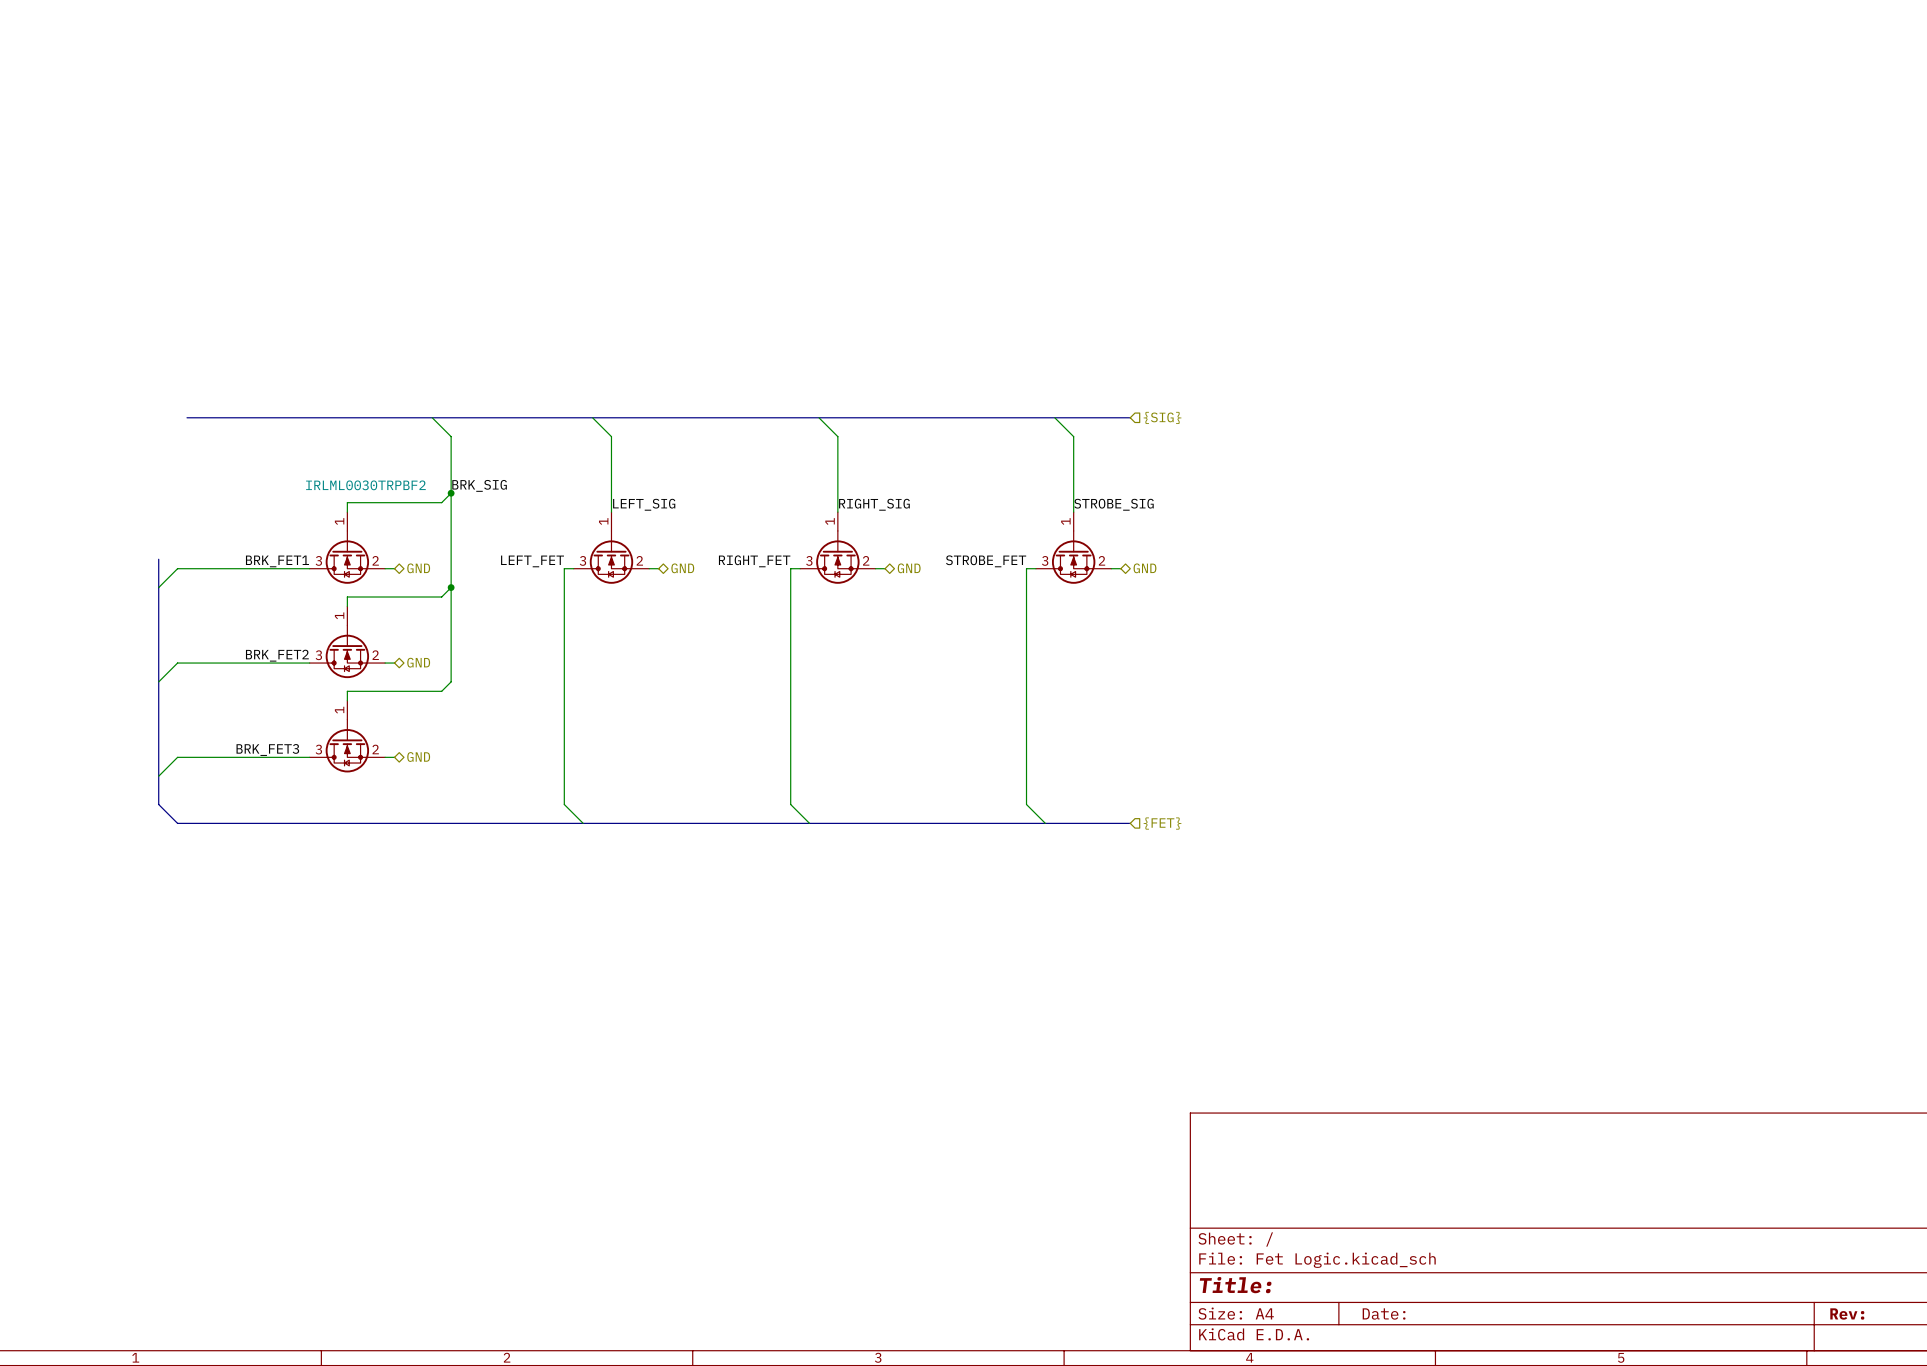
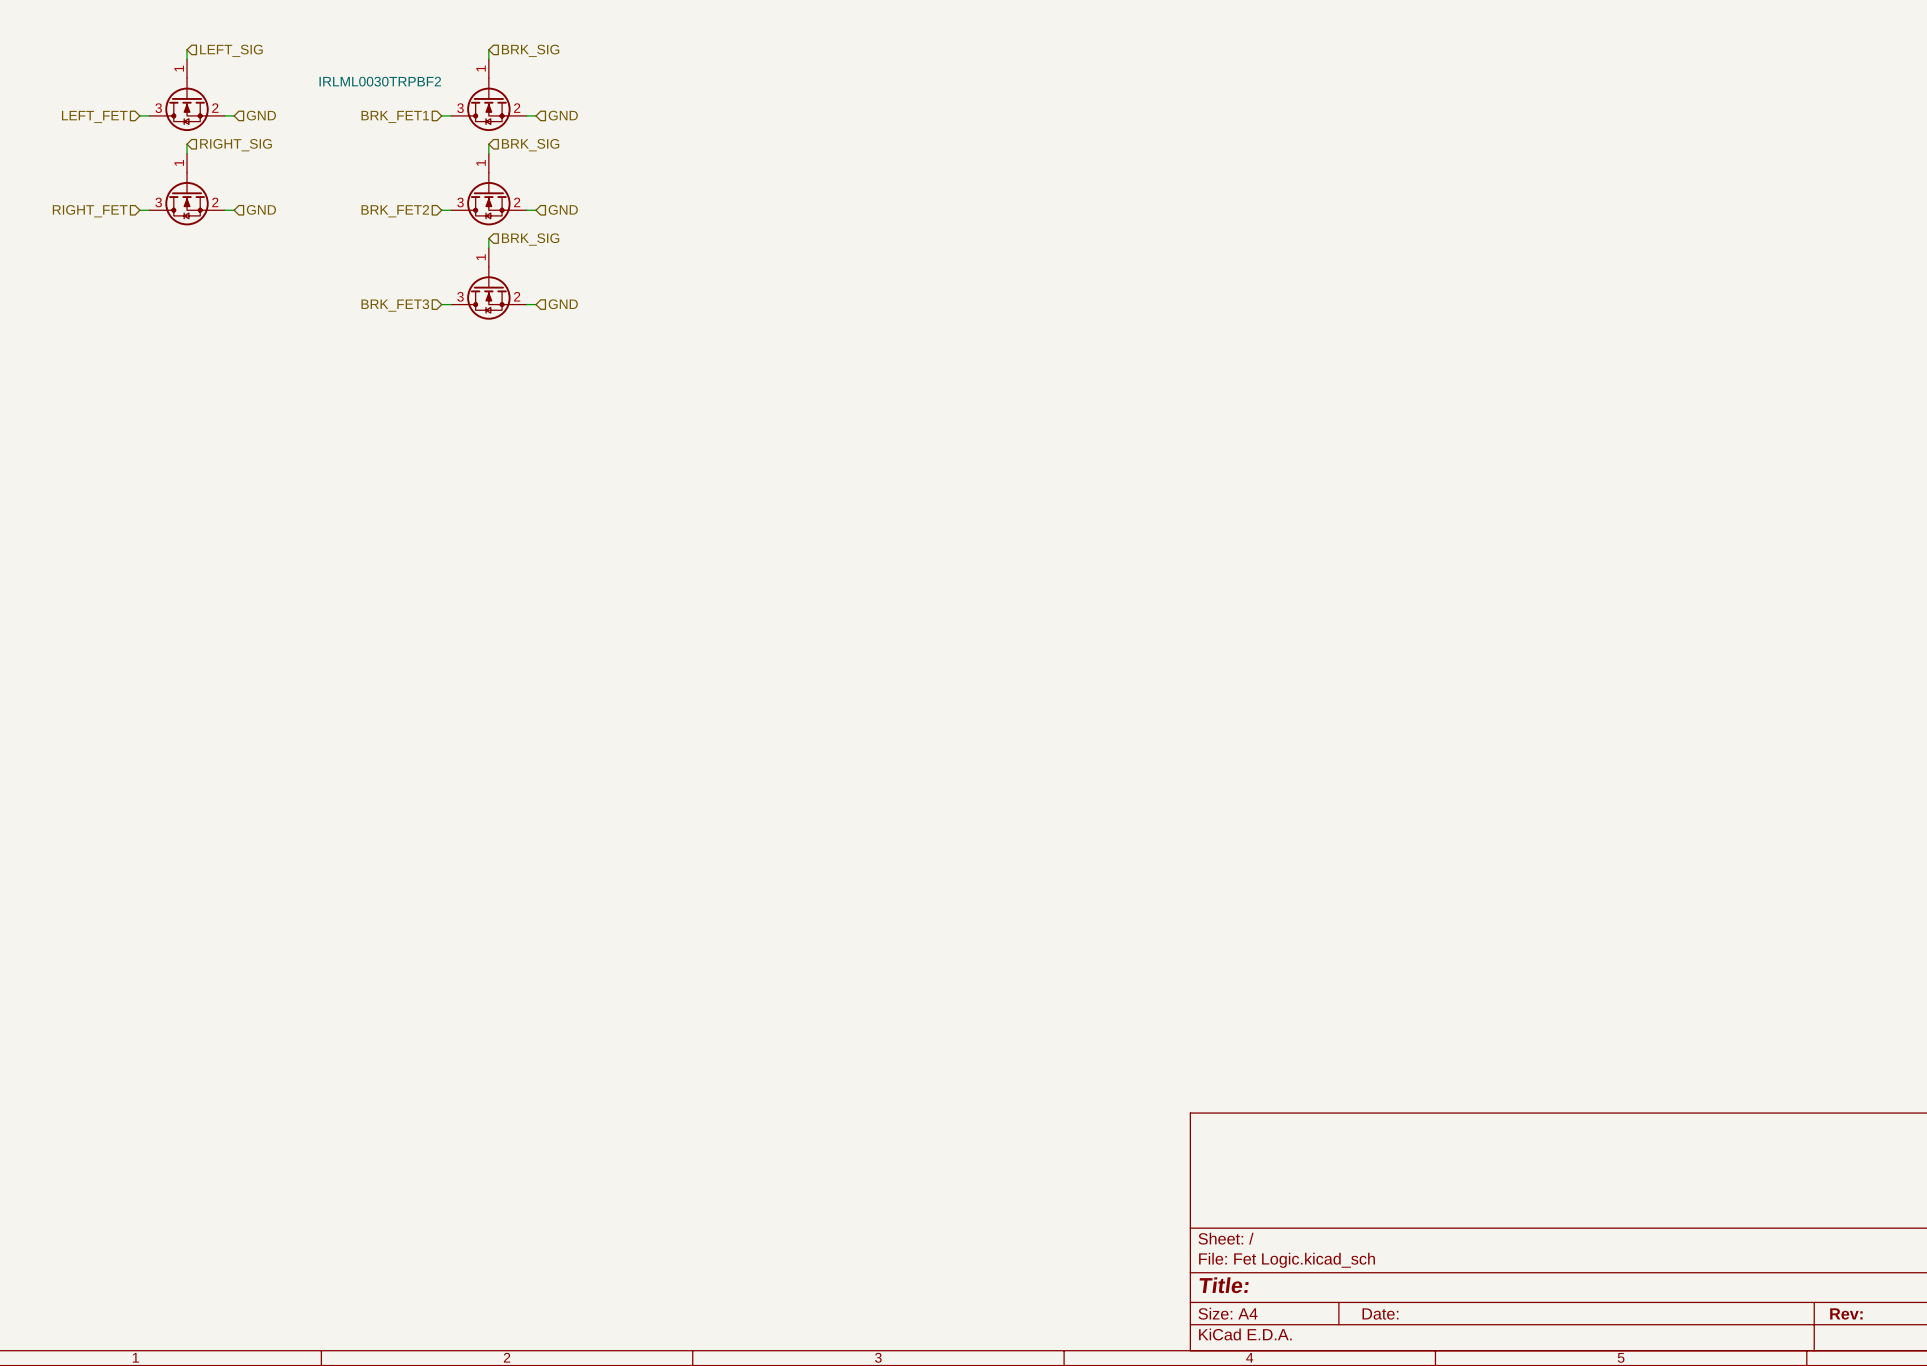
wire: none -> (187, 49) (187, 59)
wire: none -> (488, 49) (488, 59)
hierarchical label: none -> LEFT_SIG (231, 50)
hierarchical label: none -> BRK_SIG (530, 50)
part: none -> (187, 95)
wire: none -> (139, 115) (149, 115)
wire: none -> (224, 115) (234, 115)
hierarchical label: none -> GND (261, 115)
wire: none -> (441, 115) (451, 115)
wire: none -> (526, 115) (536, 115)
hierarchical label: none -> GND (563, 115)
hierarchical label: none -> LEFT_FET (94, 116)
hierarchical label: none -> BRK_FET1 (395, 116)
wire: none -> (187, 144) (187, 153)
hierarchical label: none -> RIGHT_SIG (235, 145)
wire: none -> (488, 144) (488, 153)
hierarchical label: none -> BRK_SIG (530, 145)
part: none -> (187, 189)
part: none -> (488, 189)
hierarchical label: none -> GND (261, 209)
hierarchical label: none -> GND (563, 209)
hierarchical label: none -> RIGHT_FET (90, 211)
wire: none -> (139, 210) (149, 210)
wire: none -> (224, 210) (234, 210)
hierarchical label: none -> BRK_FET2 (395, 211)
wire: none -> (441, 210) (451, 210)
wire: none -> (526, 210) (536, 210)
wire: none -> (488, 238) (488, 248)
hierarchical label: none -> BRK_SIG (530, 239)
part: none -> (488, 283)
wire: none -> (441, 304) (451, 304)
wire: none -> (526, 304) (536, 304)
hierarchical label: none -> GND (563, 304)
hierarchical label: none -> BRK_FET3 (395, 305)
bus: (187, 417) (1130, 417) -> none
wire: (432, 417) (451, 436) (451, 681) (441, 691) (347, 691) (347, 700) -> none
wire: (592, 417) (611, 436) (611, 512) -> none
wire: (818, 417) (837, 436) (837, 512) -> none
wire: (1054, 417) (1073, 436) (1073, 512) -> none
hierarchical label: {SIG} (1162, 417) -> none
IRLML0030TRPBF2 name position: IRLML0030TRPBF2 (365, 485) -> IRLML0030TRPBF2 (380, 81)
label: BRK_SIG (479, 485) -> none
wire: (451, 493) (441, 502) (347, 502) (347, 512) -> none
junction: (451, 493) -> none
label: LEFT_SIG (644, 504) -> none
label: RIGHT_SIG (874, 504) -> none
label: STROBE_SIG (1113, 504) -> none
IRLML0030TRPBF2 position: (347, 547) -> (488, 95)
part: (611, 547) -> none
part: (837, 547) -> none
part: (1073, 547) -> none
bus: (158, 559) (158, 804) (177, 823) (1130, 823) -> none
label: BRK_FET1 (277, 561) -> none
label: LEFT_FET (532, 561) -> none
label: RIGHT_FET (754, 561) -> none
label: STROBE_FET (986, 561) -> none
wire: (309, 568) (177, 568) (158, 587) -> none
wire: (385, 568) (394, 568) -> none
hierarchical label: GND (418, 568) -> none
wire: (573, 568) (564, 568) (564, 804) (583, 823) -> none
wire: (649, 568) (658, 568) -> none
hierarchical label: GND (682, 568) -> none
wire: (800, 568) (790, 568) (790, 804) (809, 823) -> none
wire: (875, 568) (885, 568) -> none
hierarchical label: GND (909, 568) -> none
wire: (1035, 568) (1026, 568) (1026, 804) (1045, 823) -> none
wire: (1111, 568) (1120, 568) -> none
hierarchical label: GND (1144, 568) -> none
wire: (451, 587) (441, 597) (347, 597) (347, 606) -> none
junction: (451, 587) -> none
part: (347, 642) -> none
label: BRK_FET2 (277, 655) -> none
hierarchical label: GND (418, 662) -> none
wire: (309, 663) (177, 663) (158, 681) -> none
wire: (385, 663) (394, 663) -> none
part: (347, 736) -> none
label: BRK_FET3 (267, 749) -> none
wire: (309, 757) (177, 757) (158, 776) -> none
wire: (385, 757) (394, 757) -> none
hierarchical label: GND (418, 757) -> none
hierarchical label: {FET} (1162, 823) -> none

